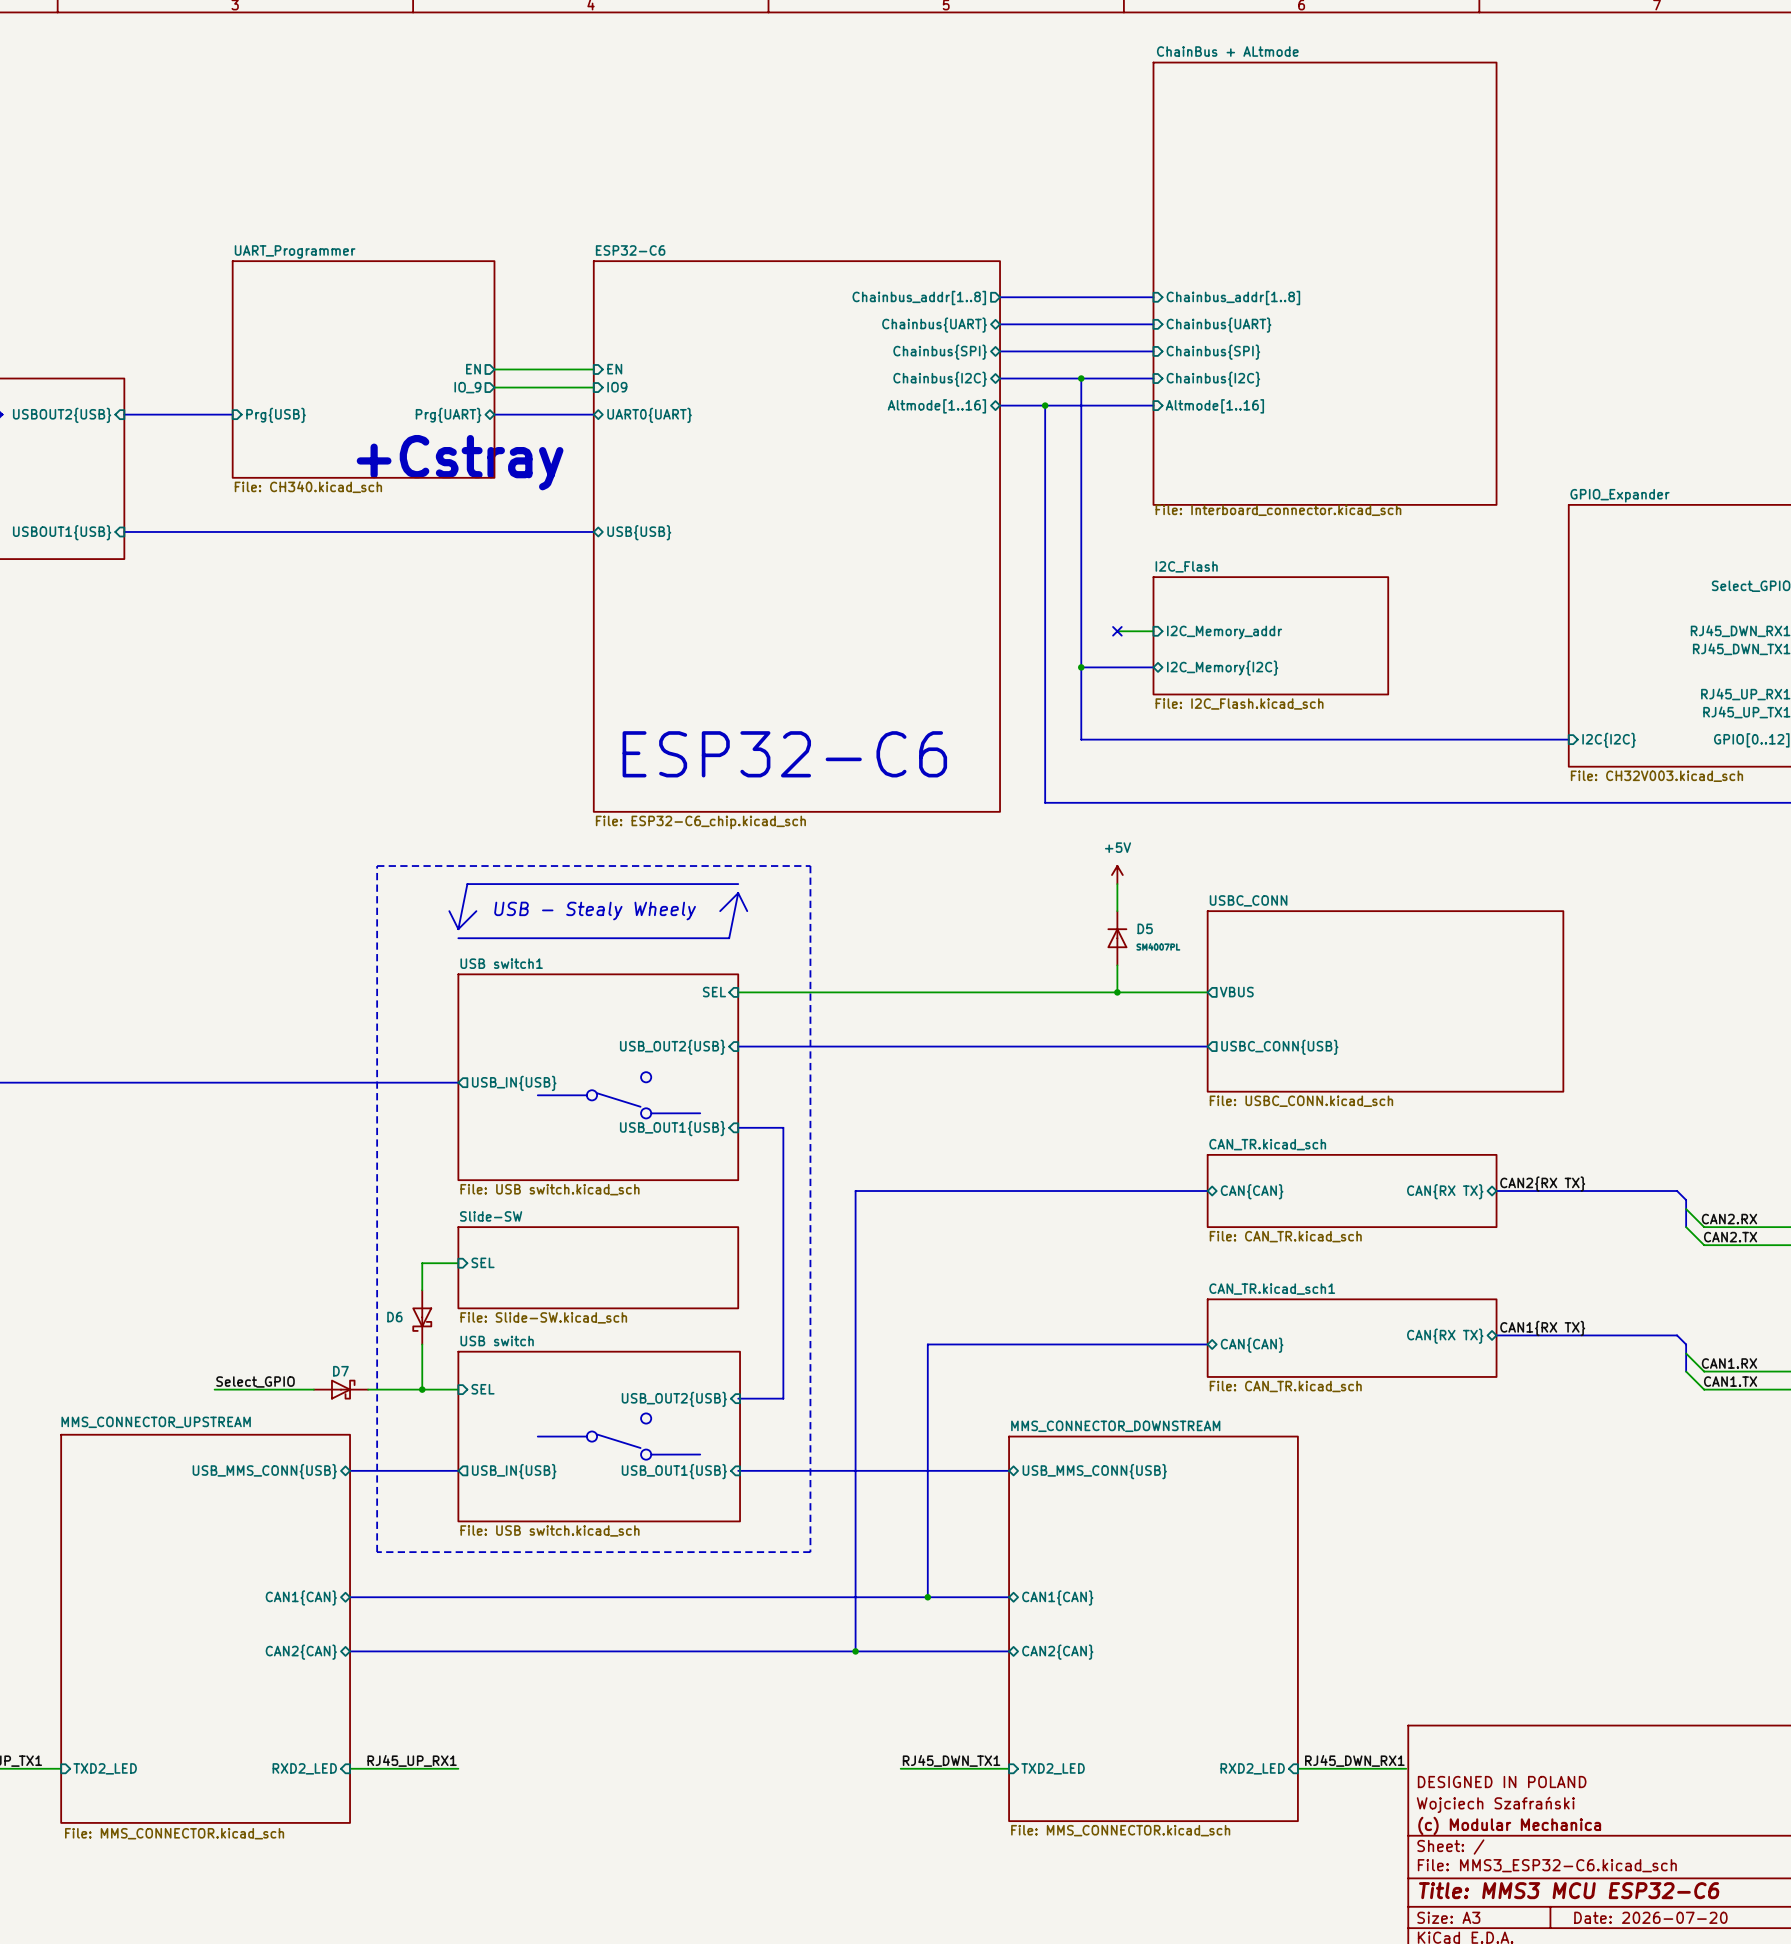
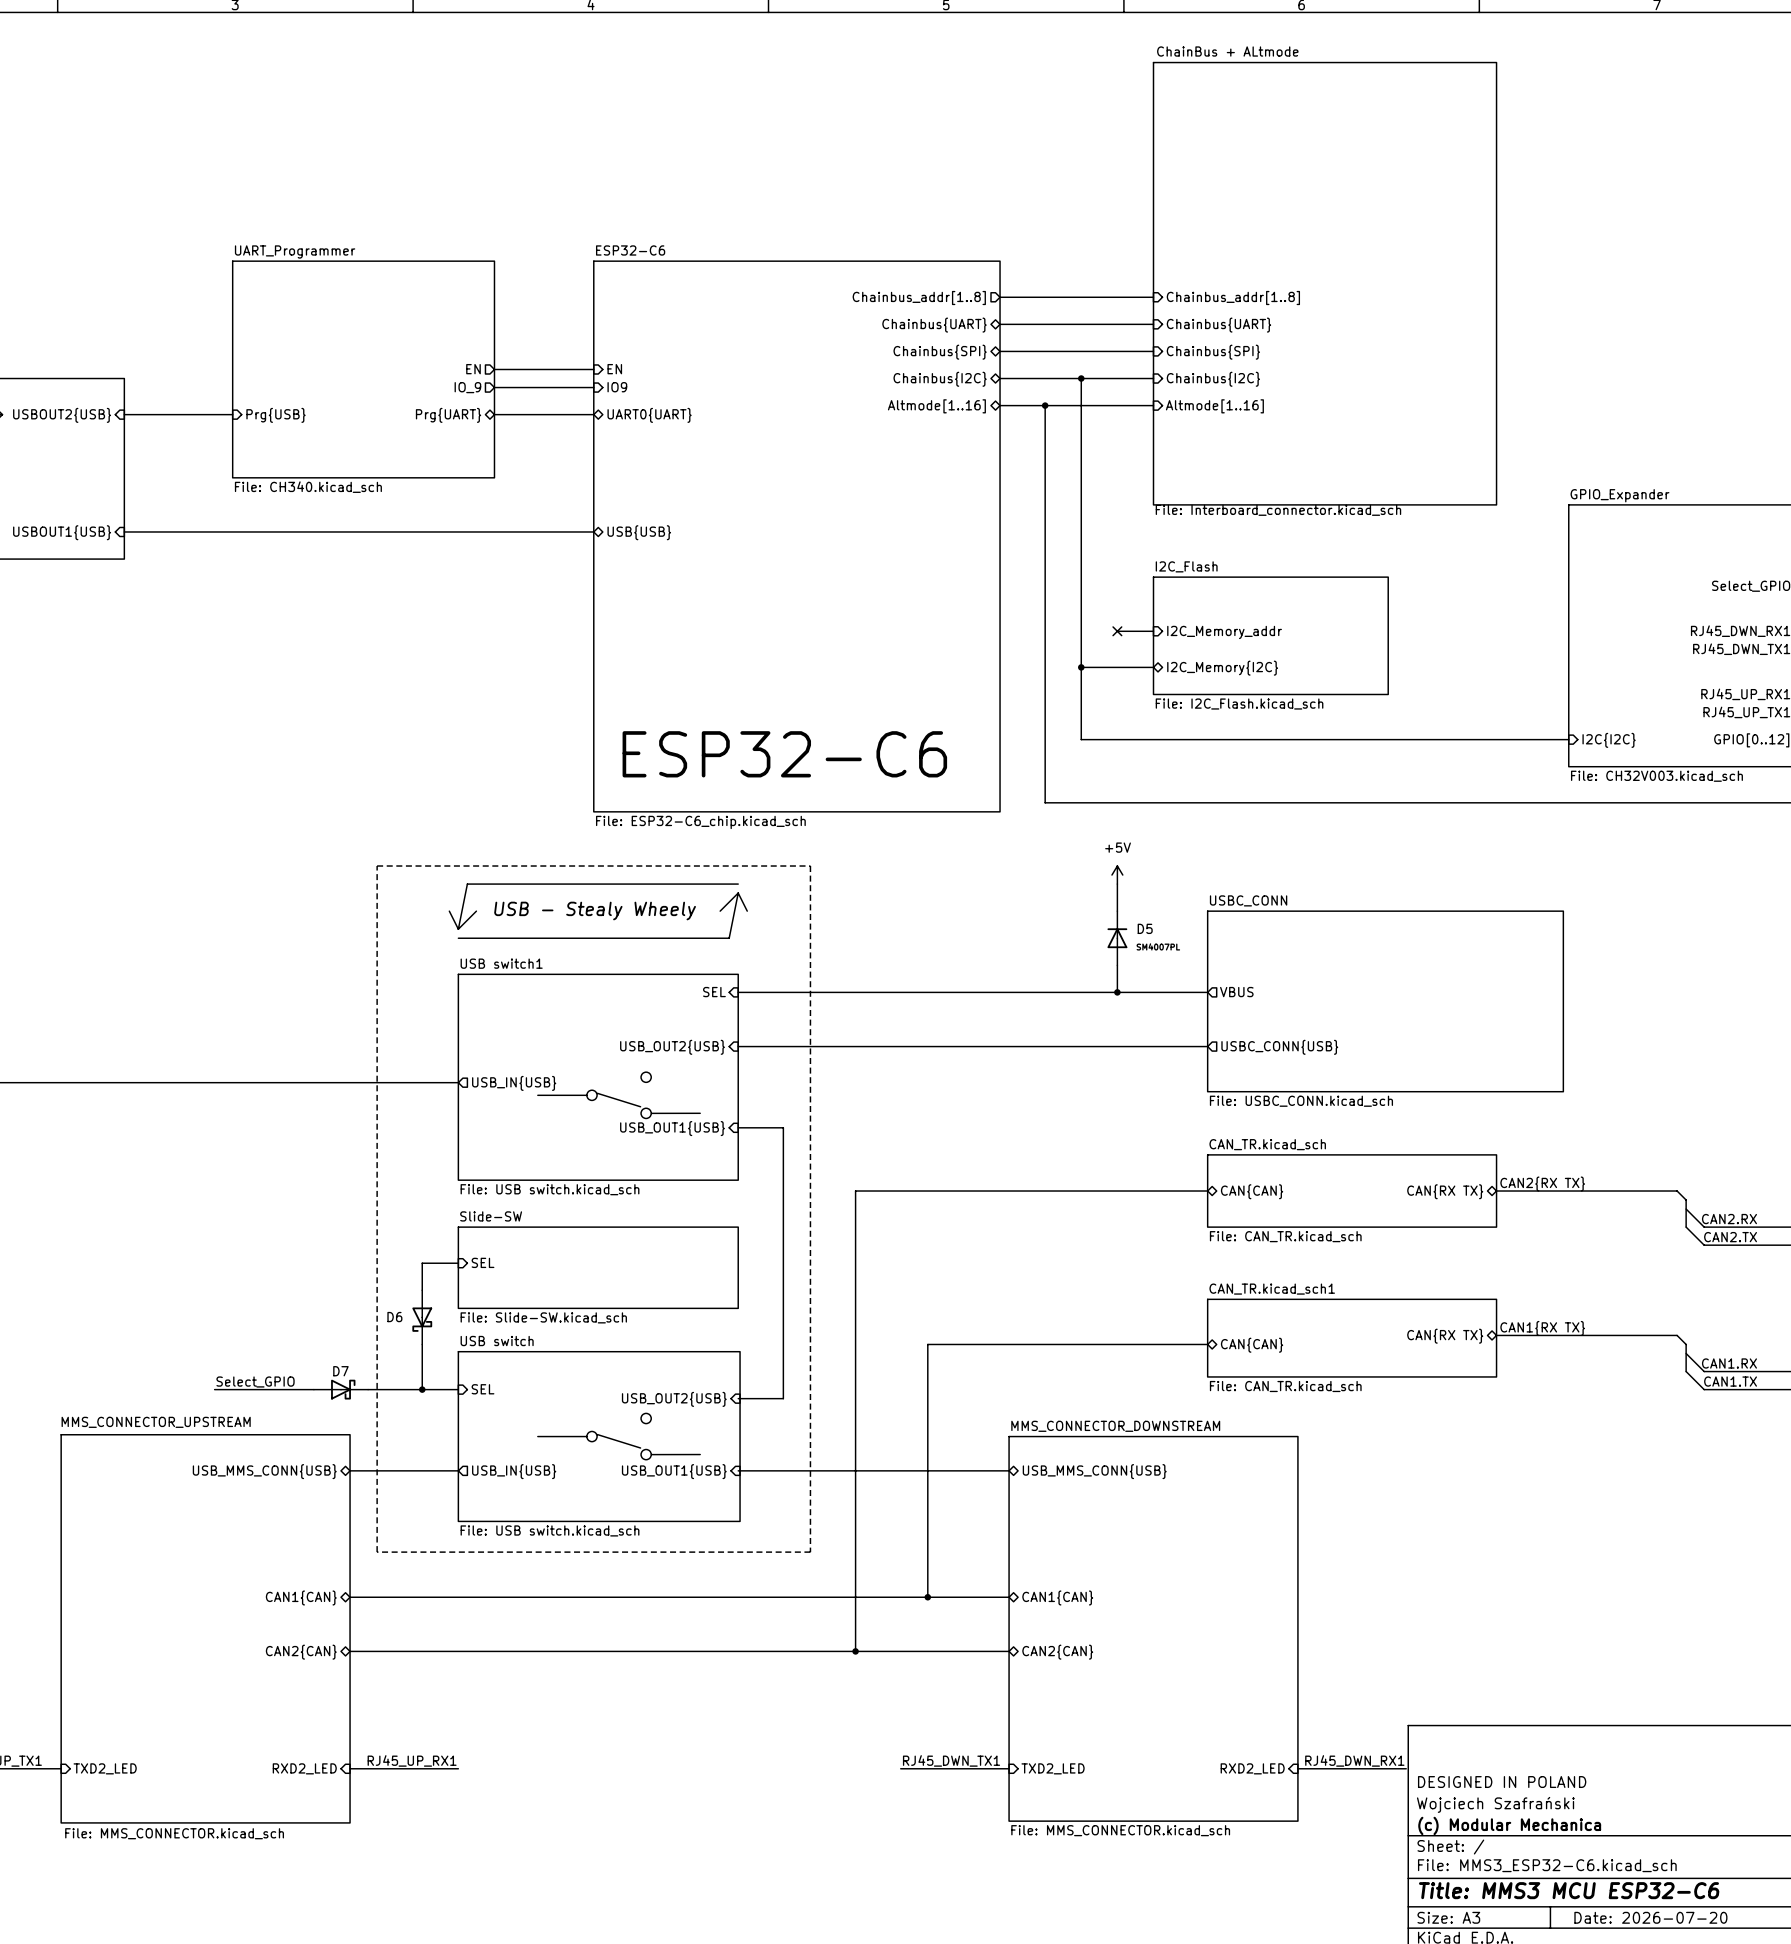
text: +Cstray (460, 462) -> none

